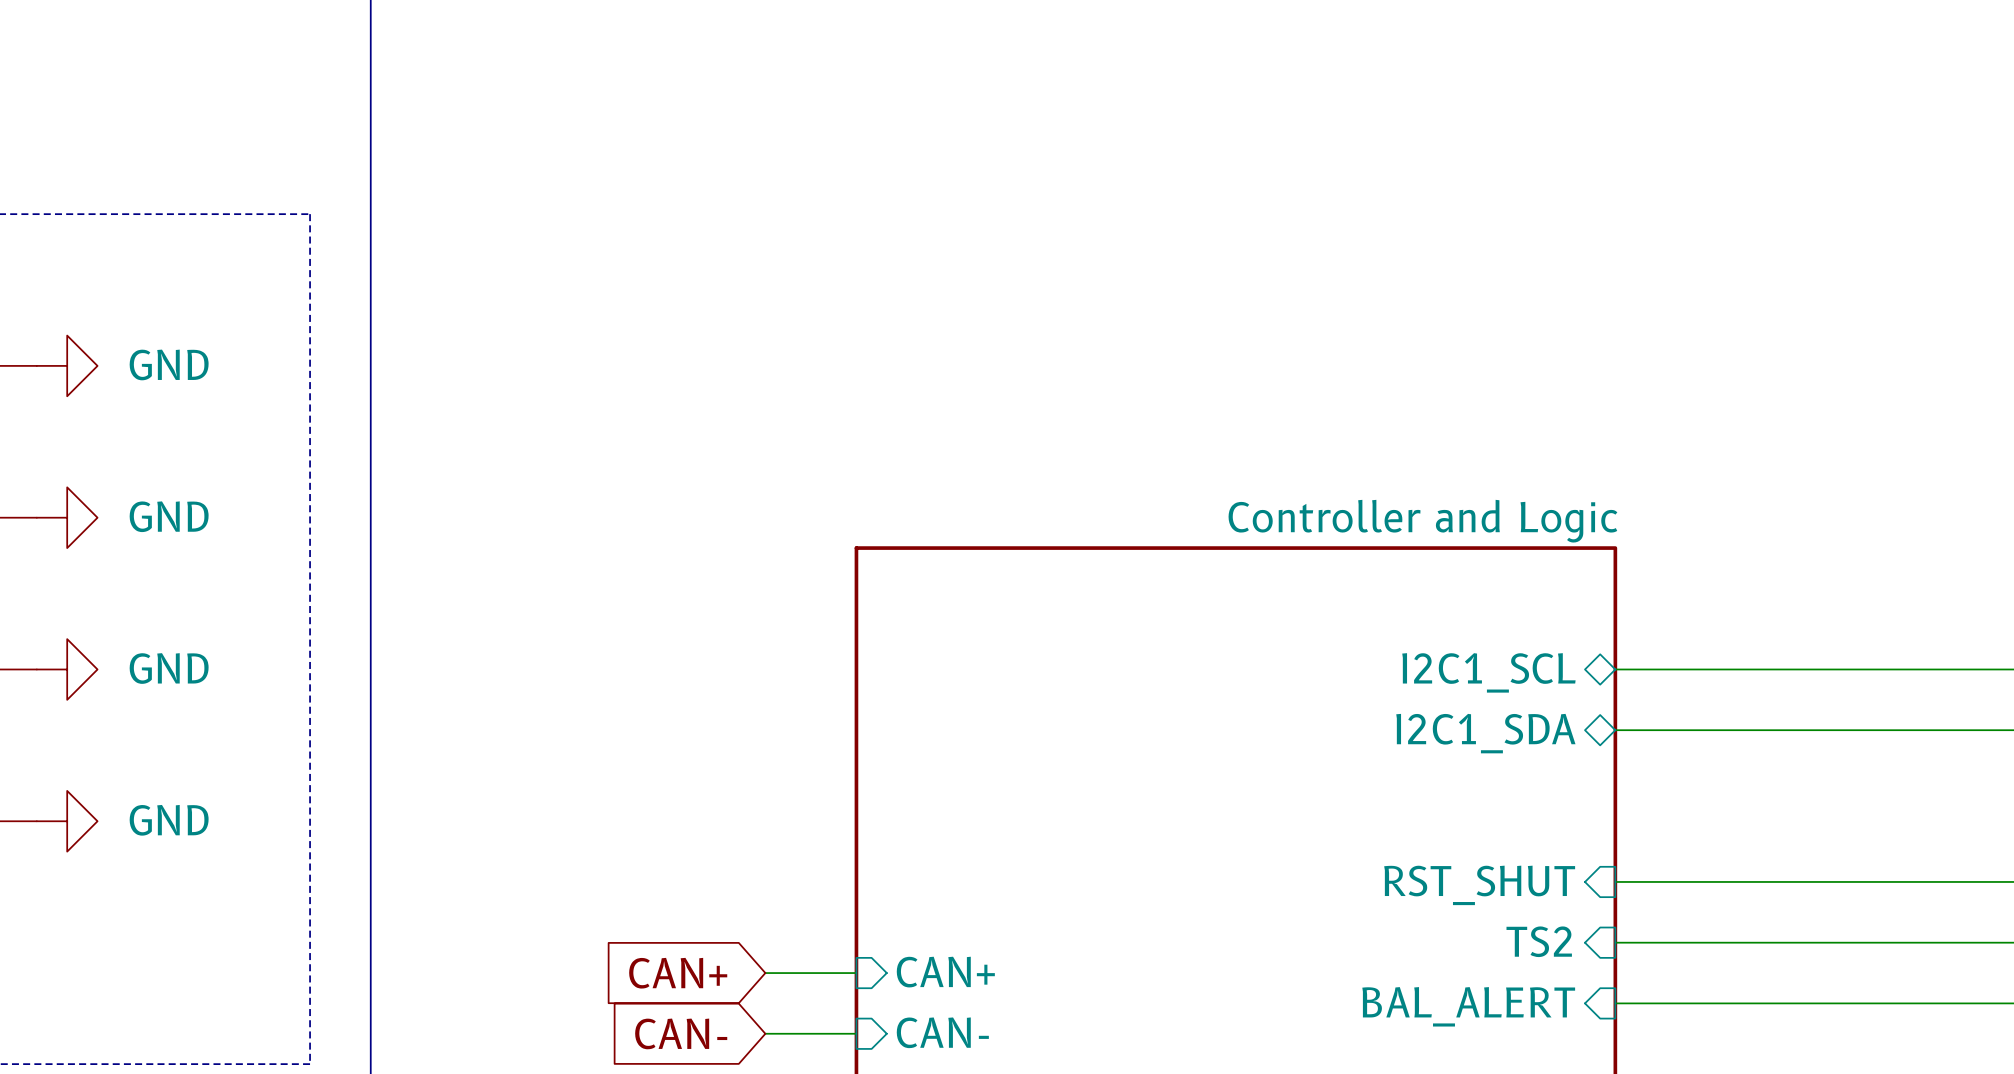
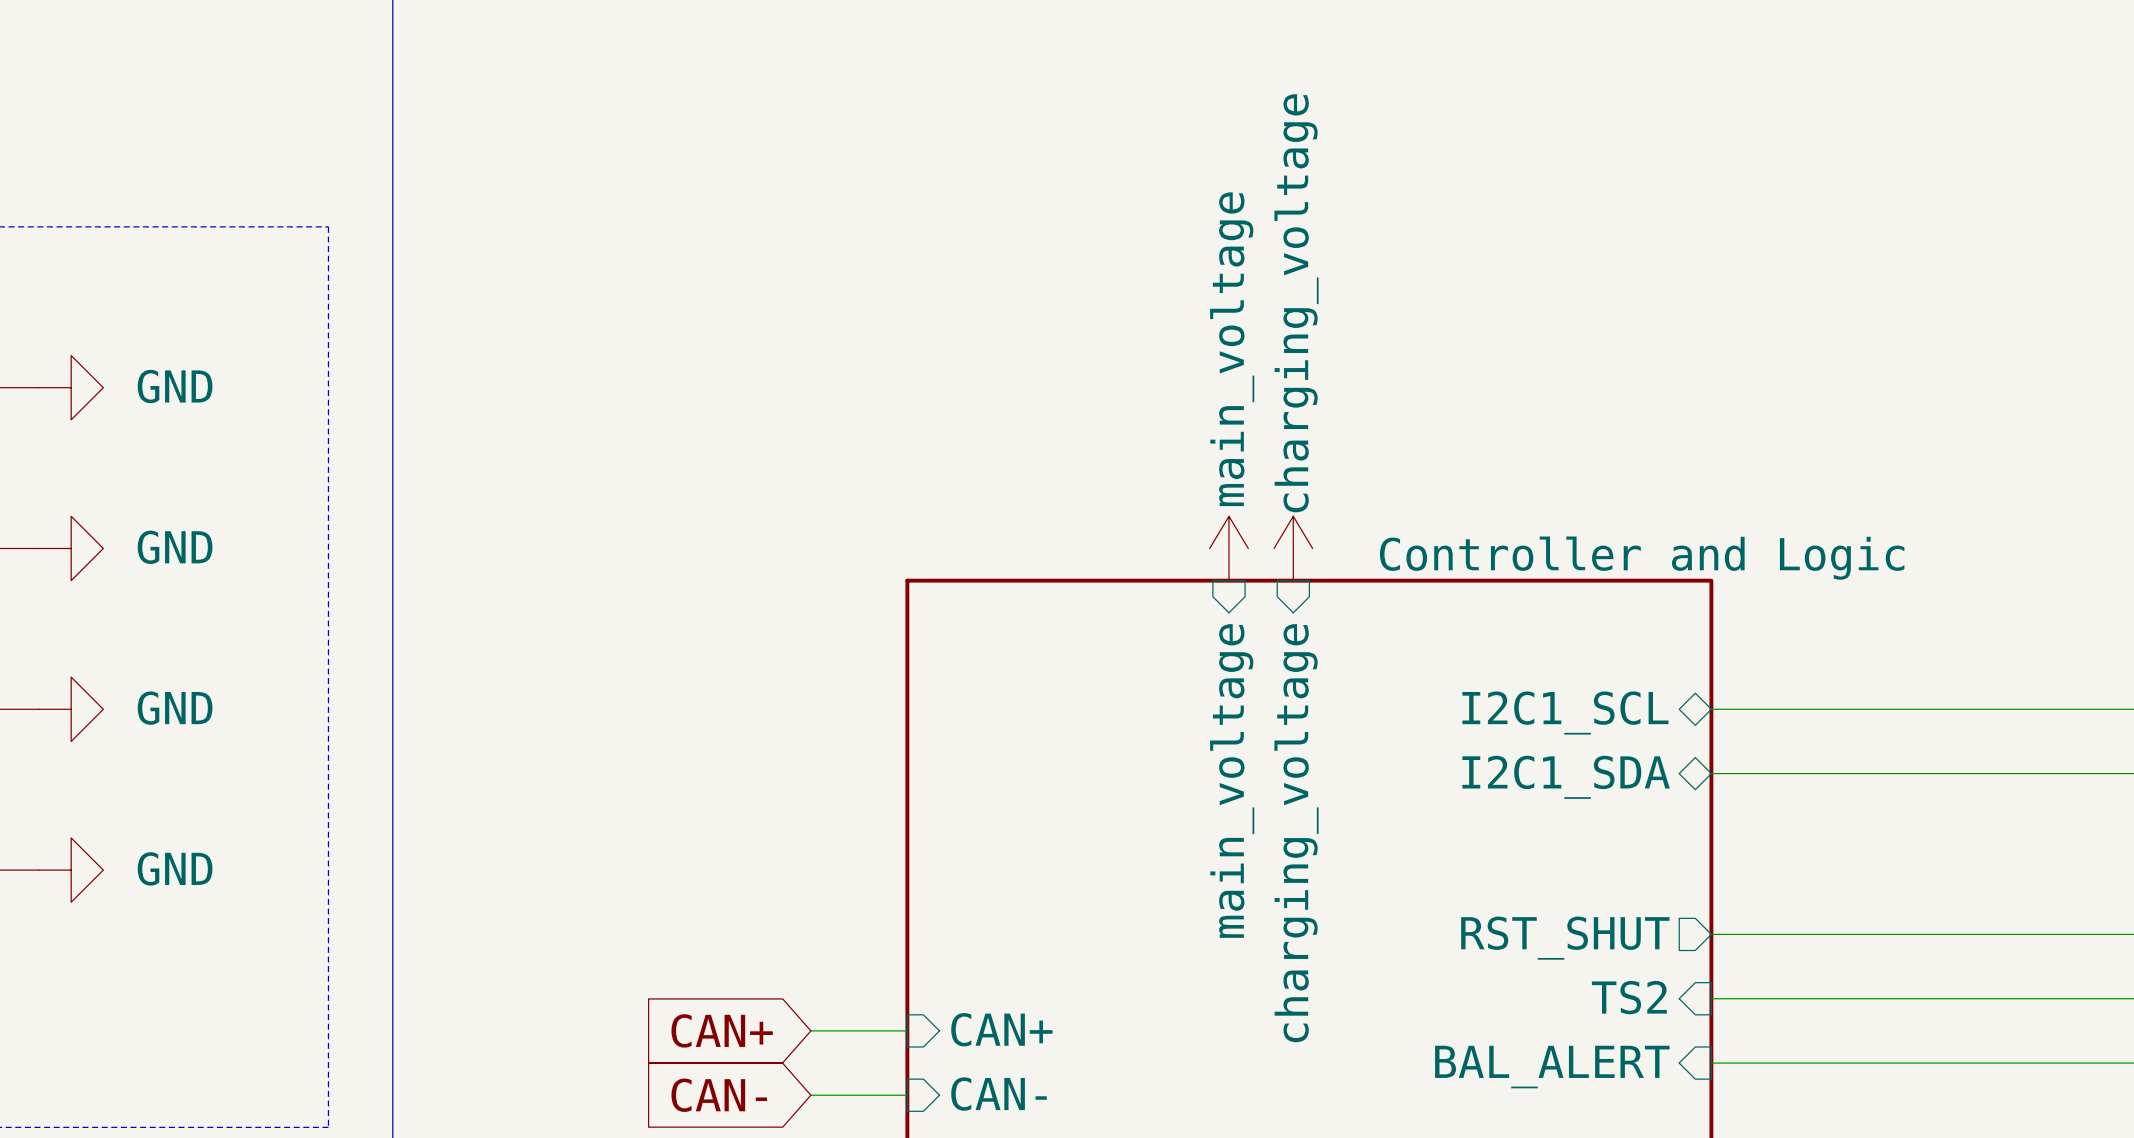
power symbol: none -> main_voltage (1228, 548)
power symbol: none -> charging_voltage (1293, 548)
sheet Controller and Logic name position: Controller and Logic (1422, 521) -> Controller and Logic (1642, 558)
sheet pin: none -> main_voltage (1232, 780)
sheet pin: none -> charging_voltage (1296, 833)
sheet pin shape: input (1479, 885) -> output (1565, 938)

